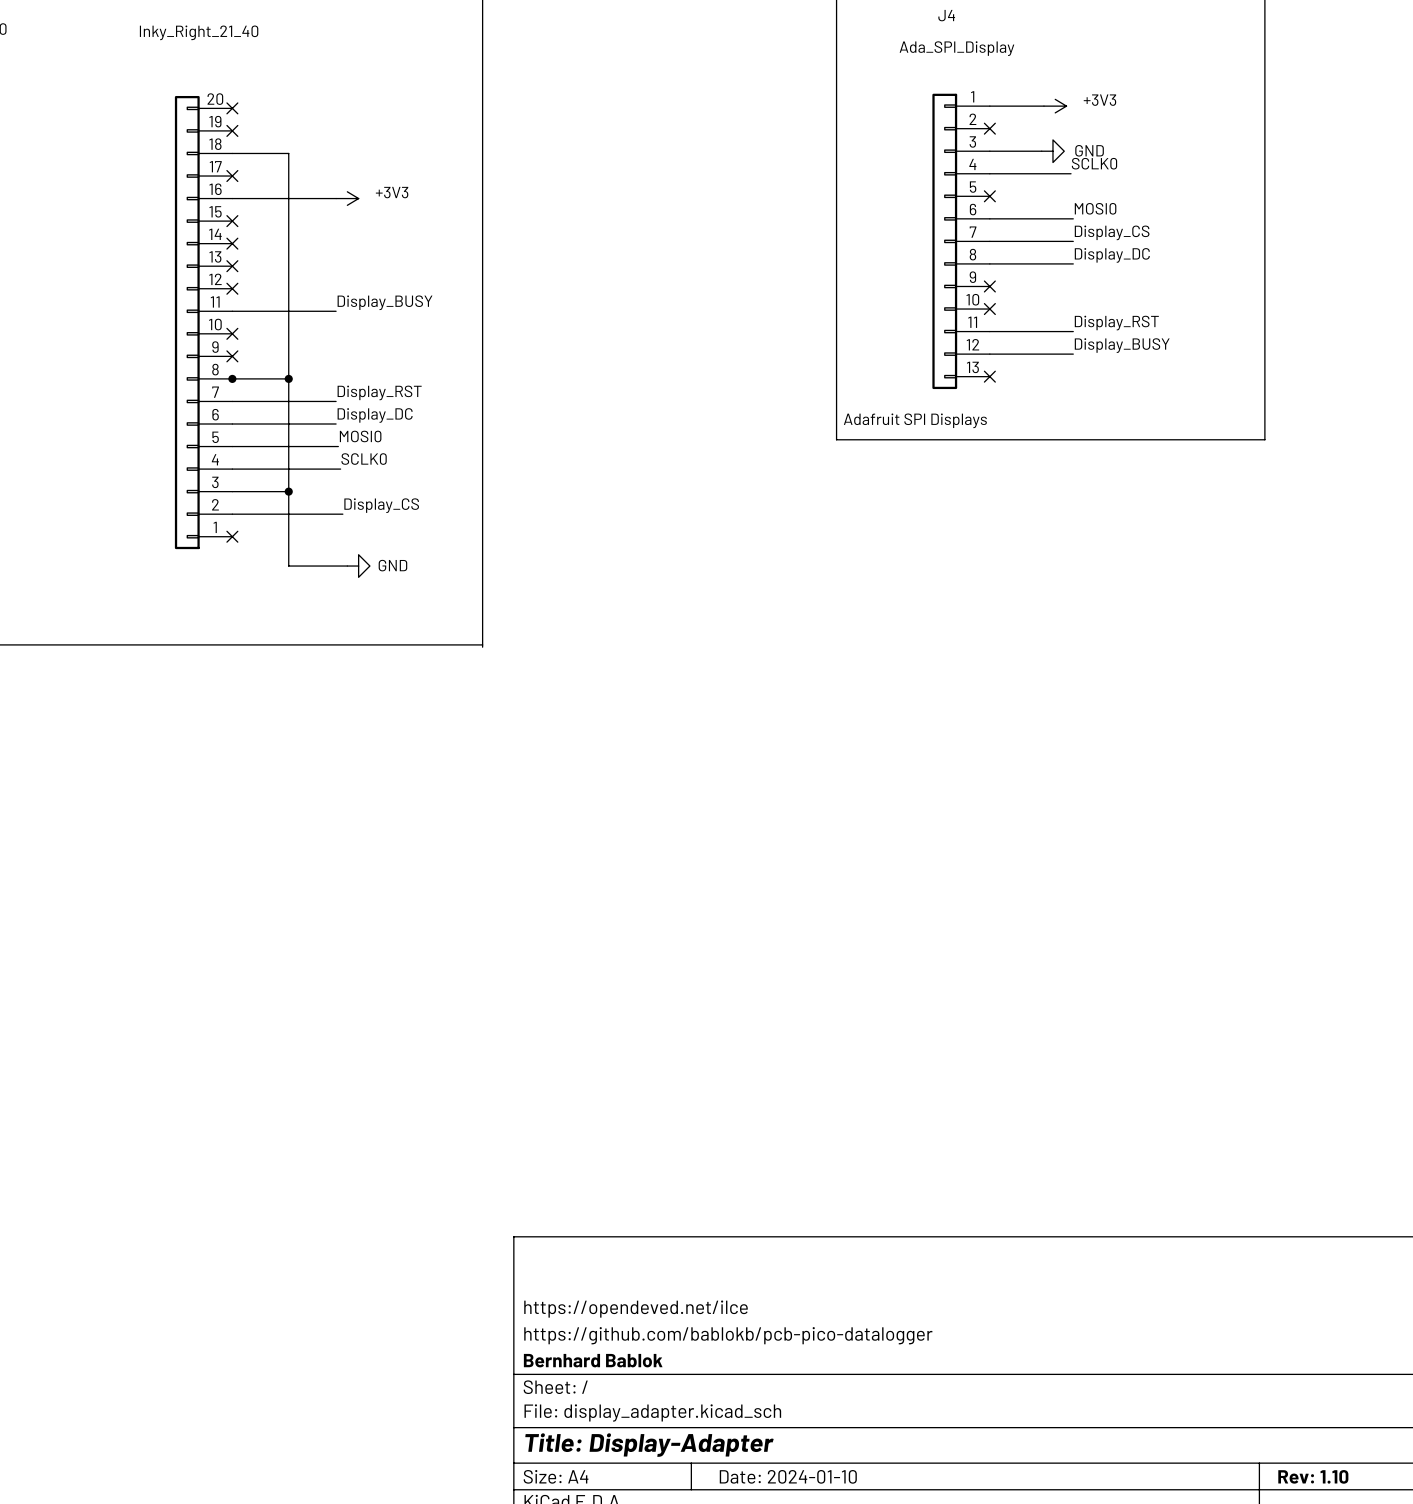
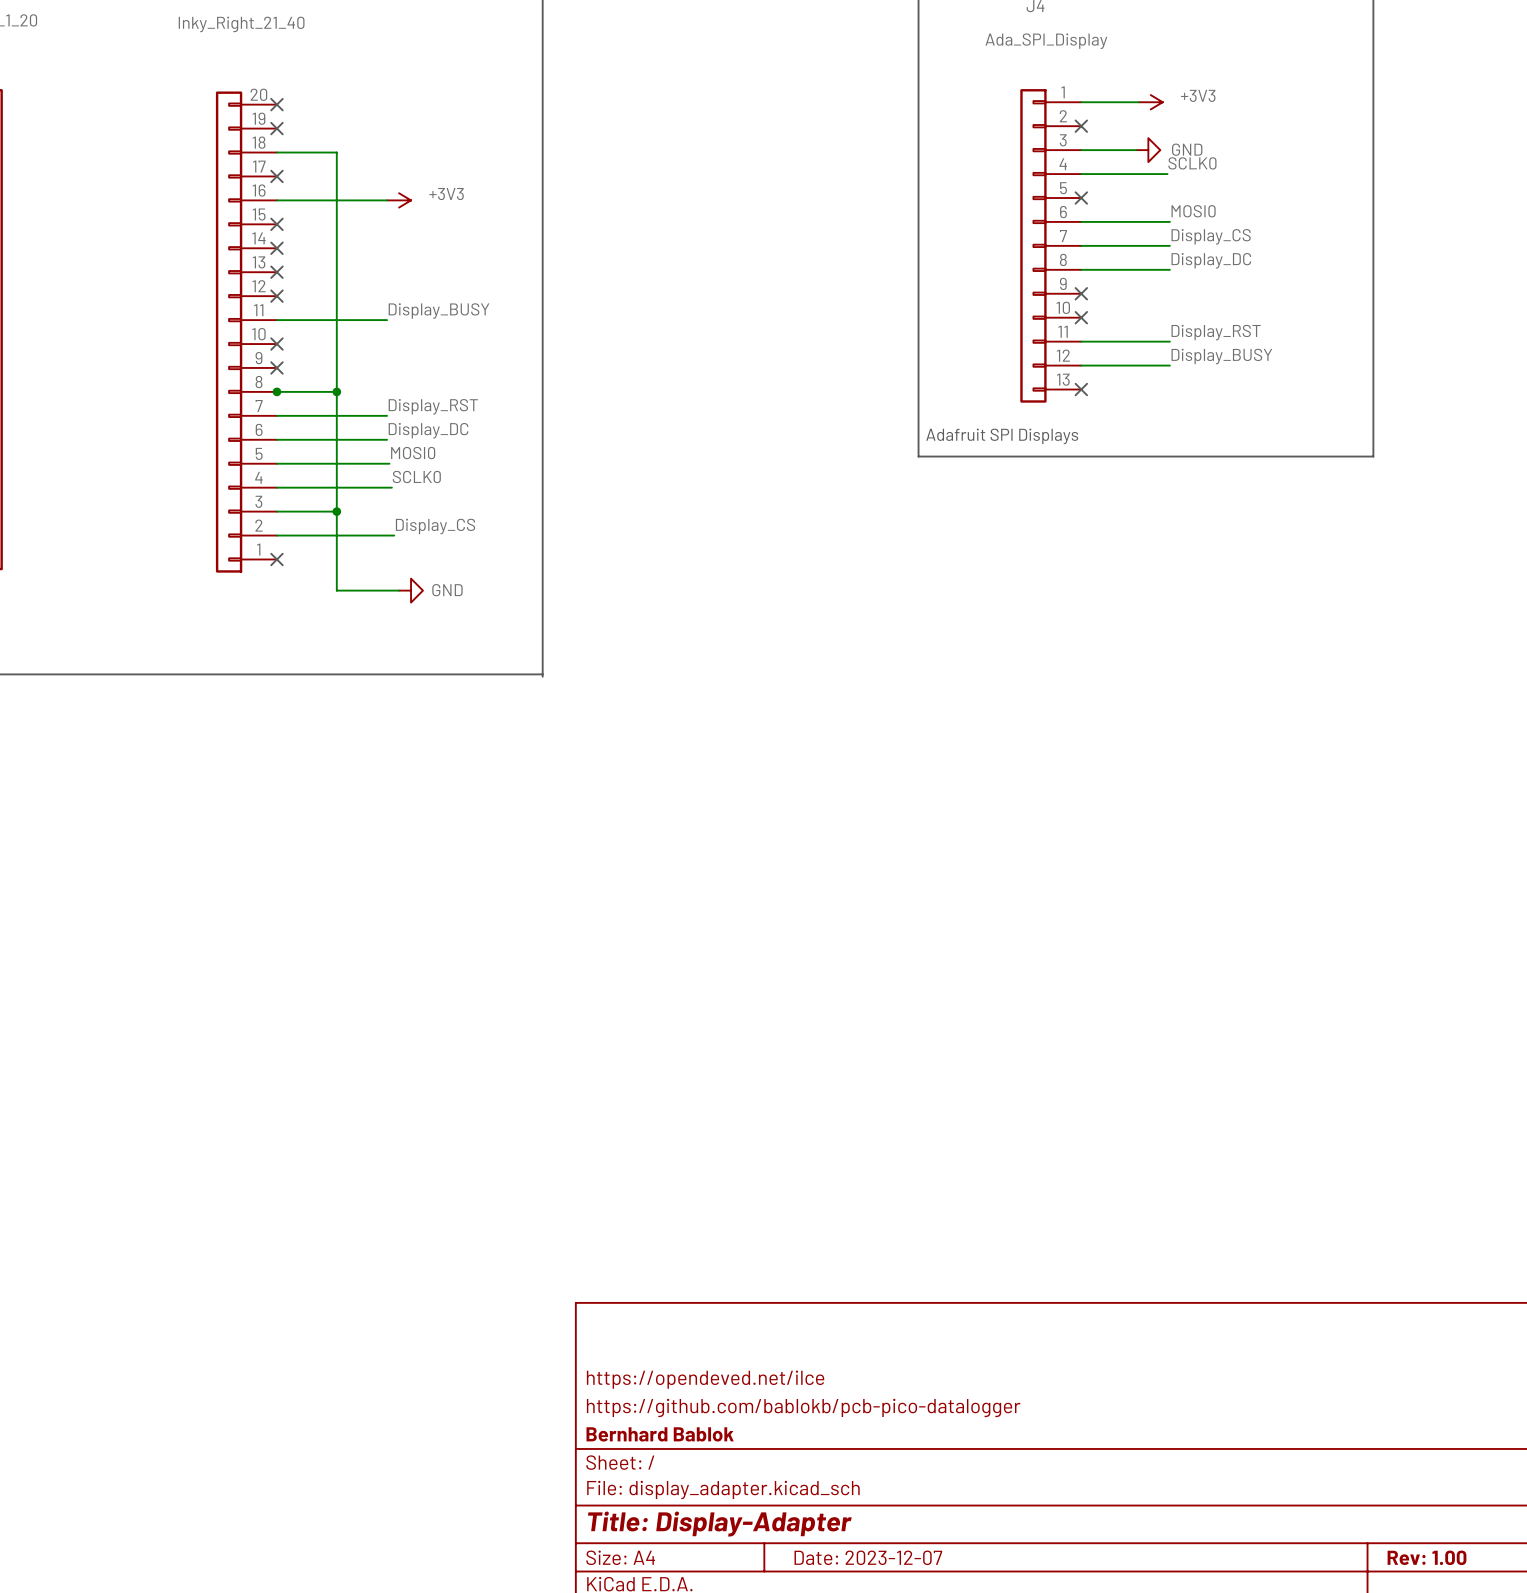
title block: Date: 2024-01-10 (788, 1476) -> Date: 2023-12-07 (868, 1557)
title block: Rev: 1.10 (1313, 1476) -> Rev: 1.00 (1427, 1557)

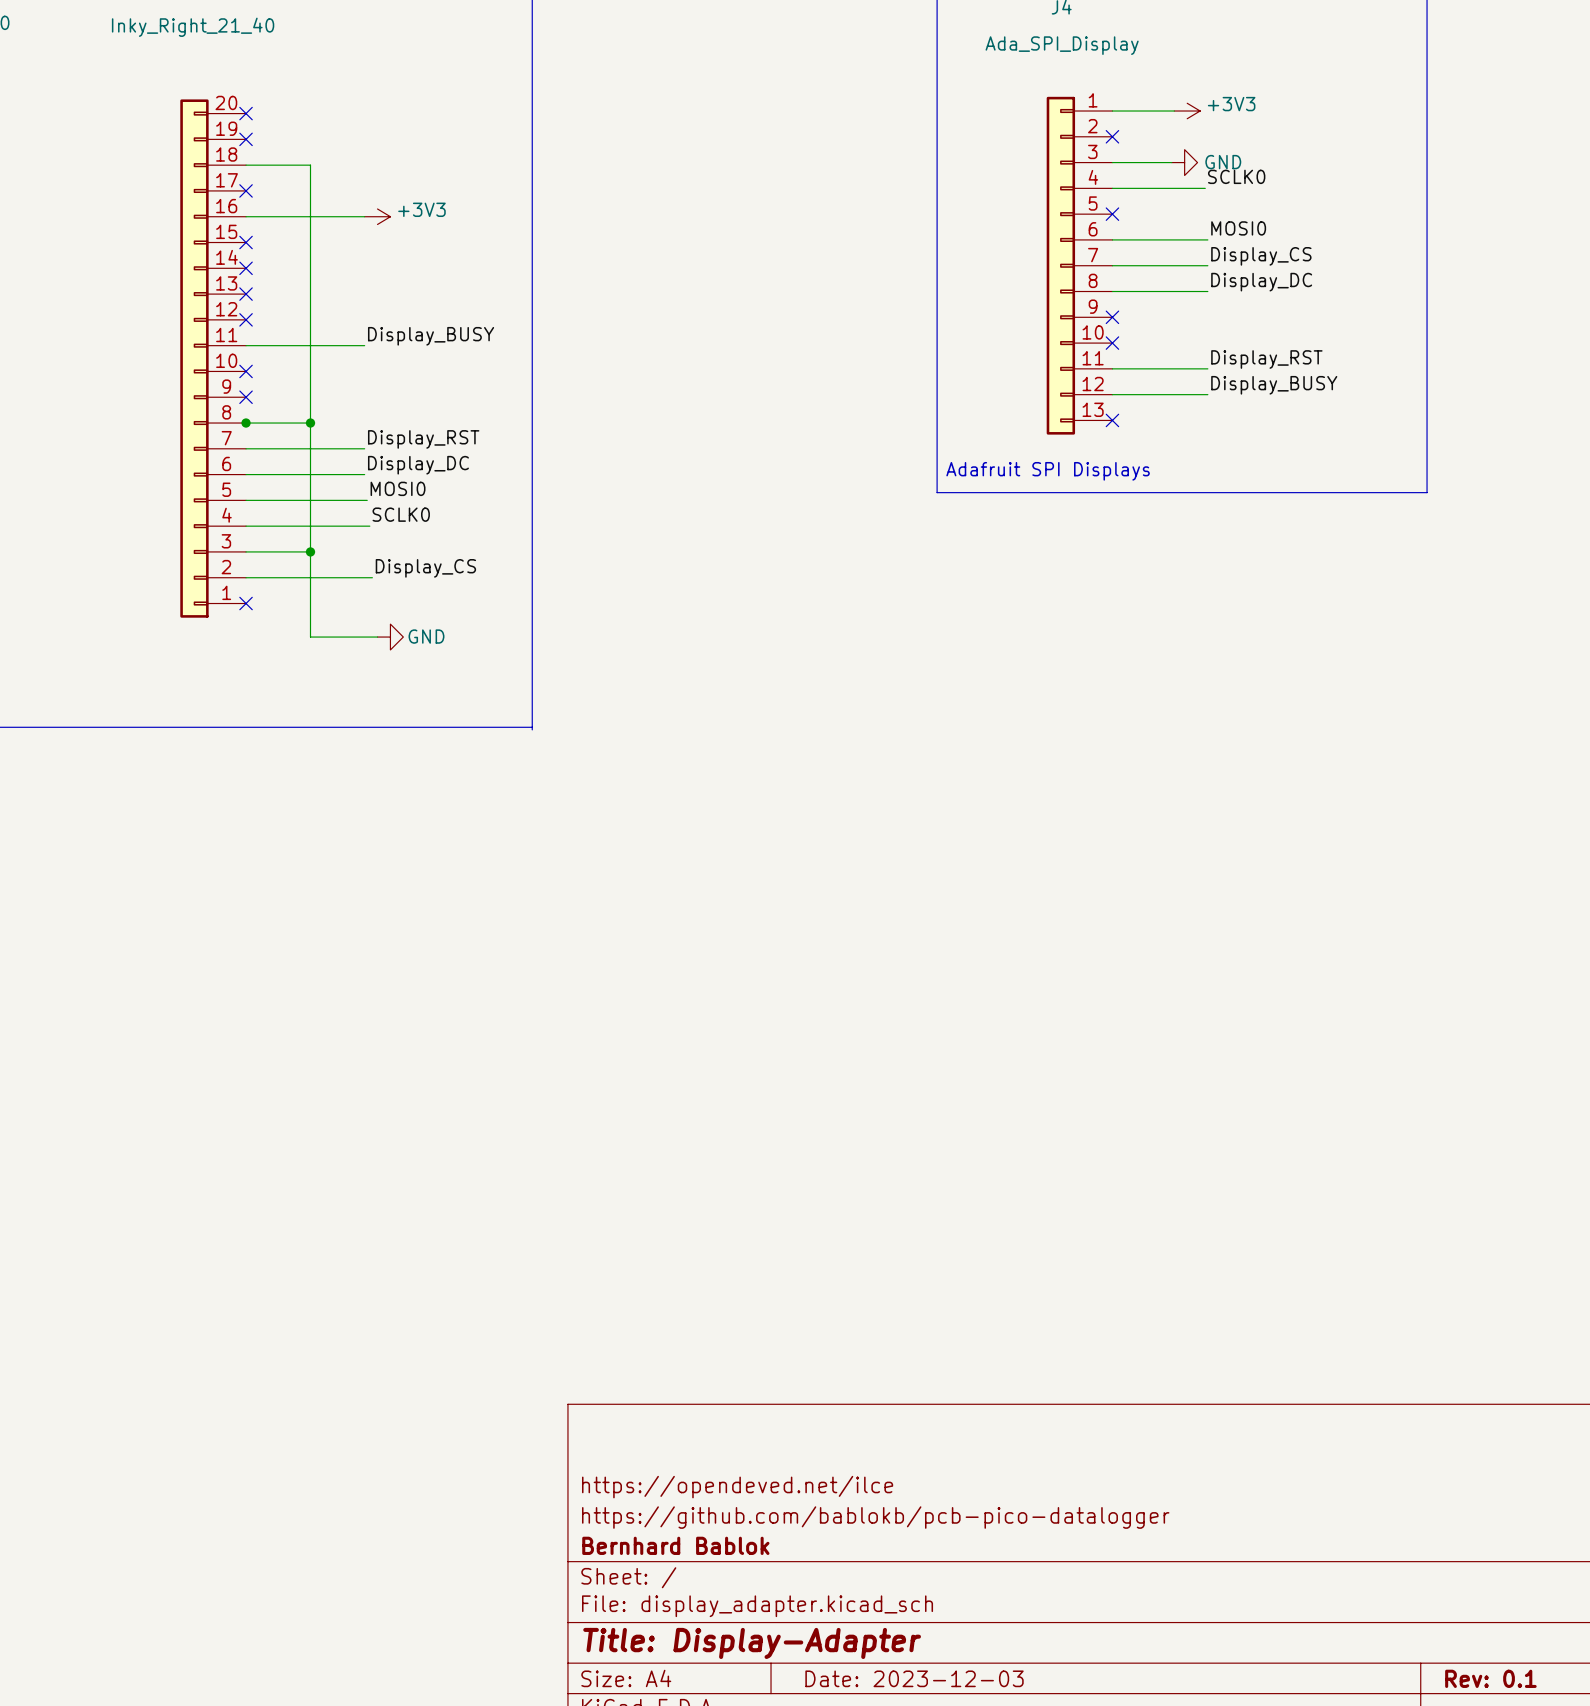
title block: Date: 2023-12-07 (868, 1557) -> Date: 2023-12-03 (914, 1678)
title block: Rev: 1.00 (1427, 1557) -> Rev: 0.1 (1490, 1678)

